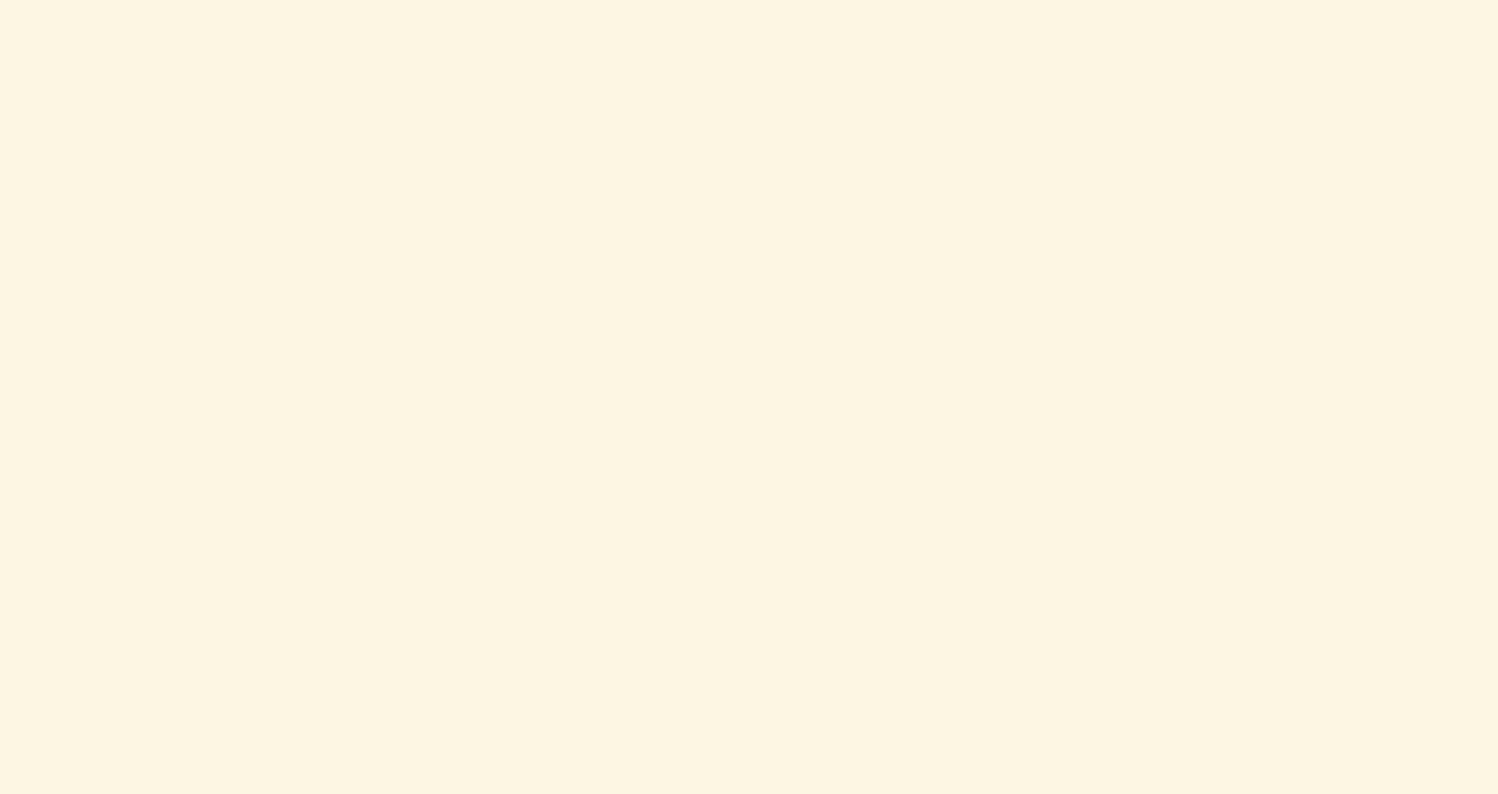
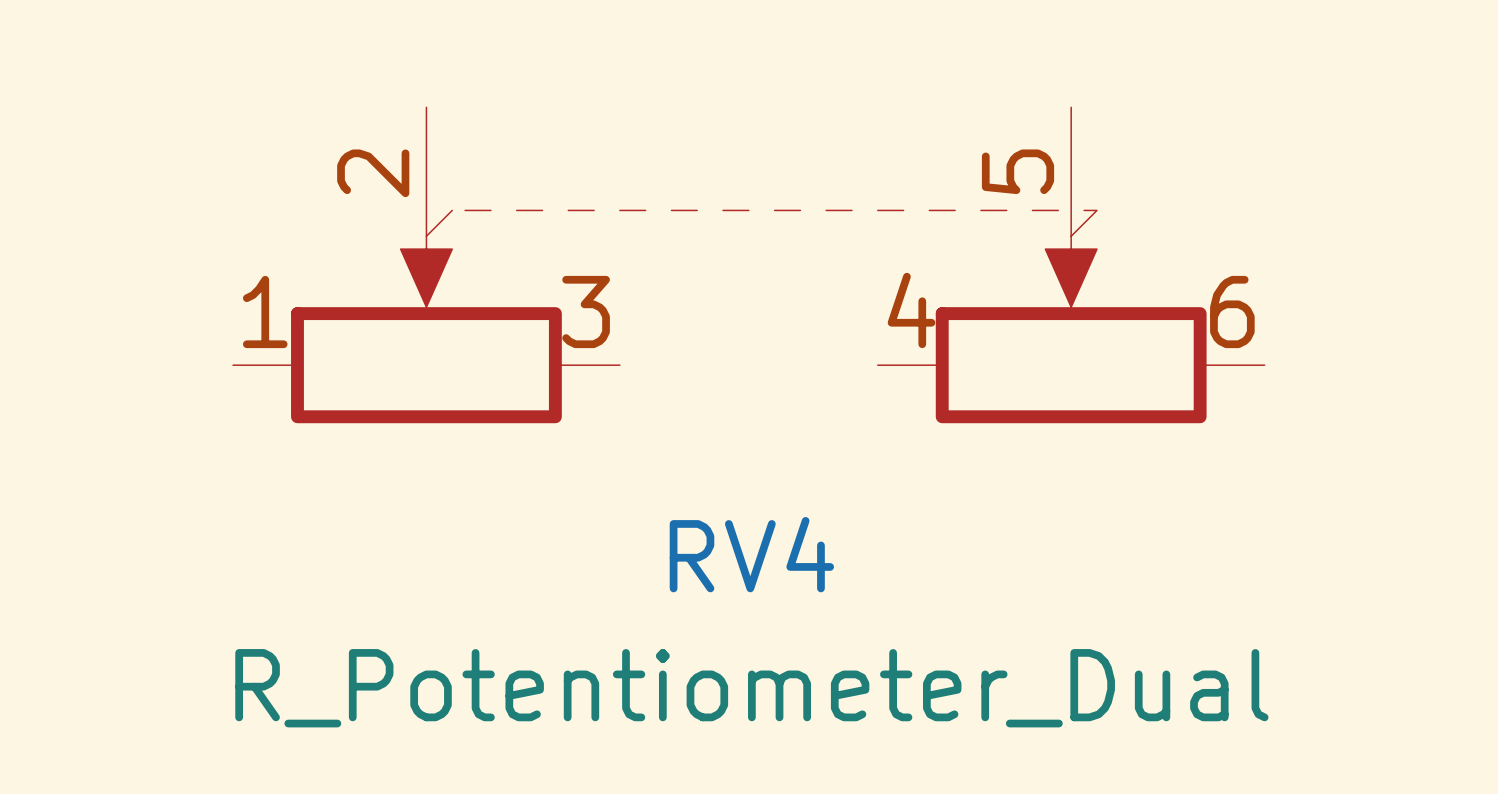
RV4: none -> R_Potentiometer_Dual (748, 265)

